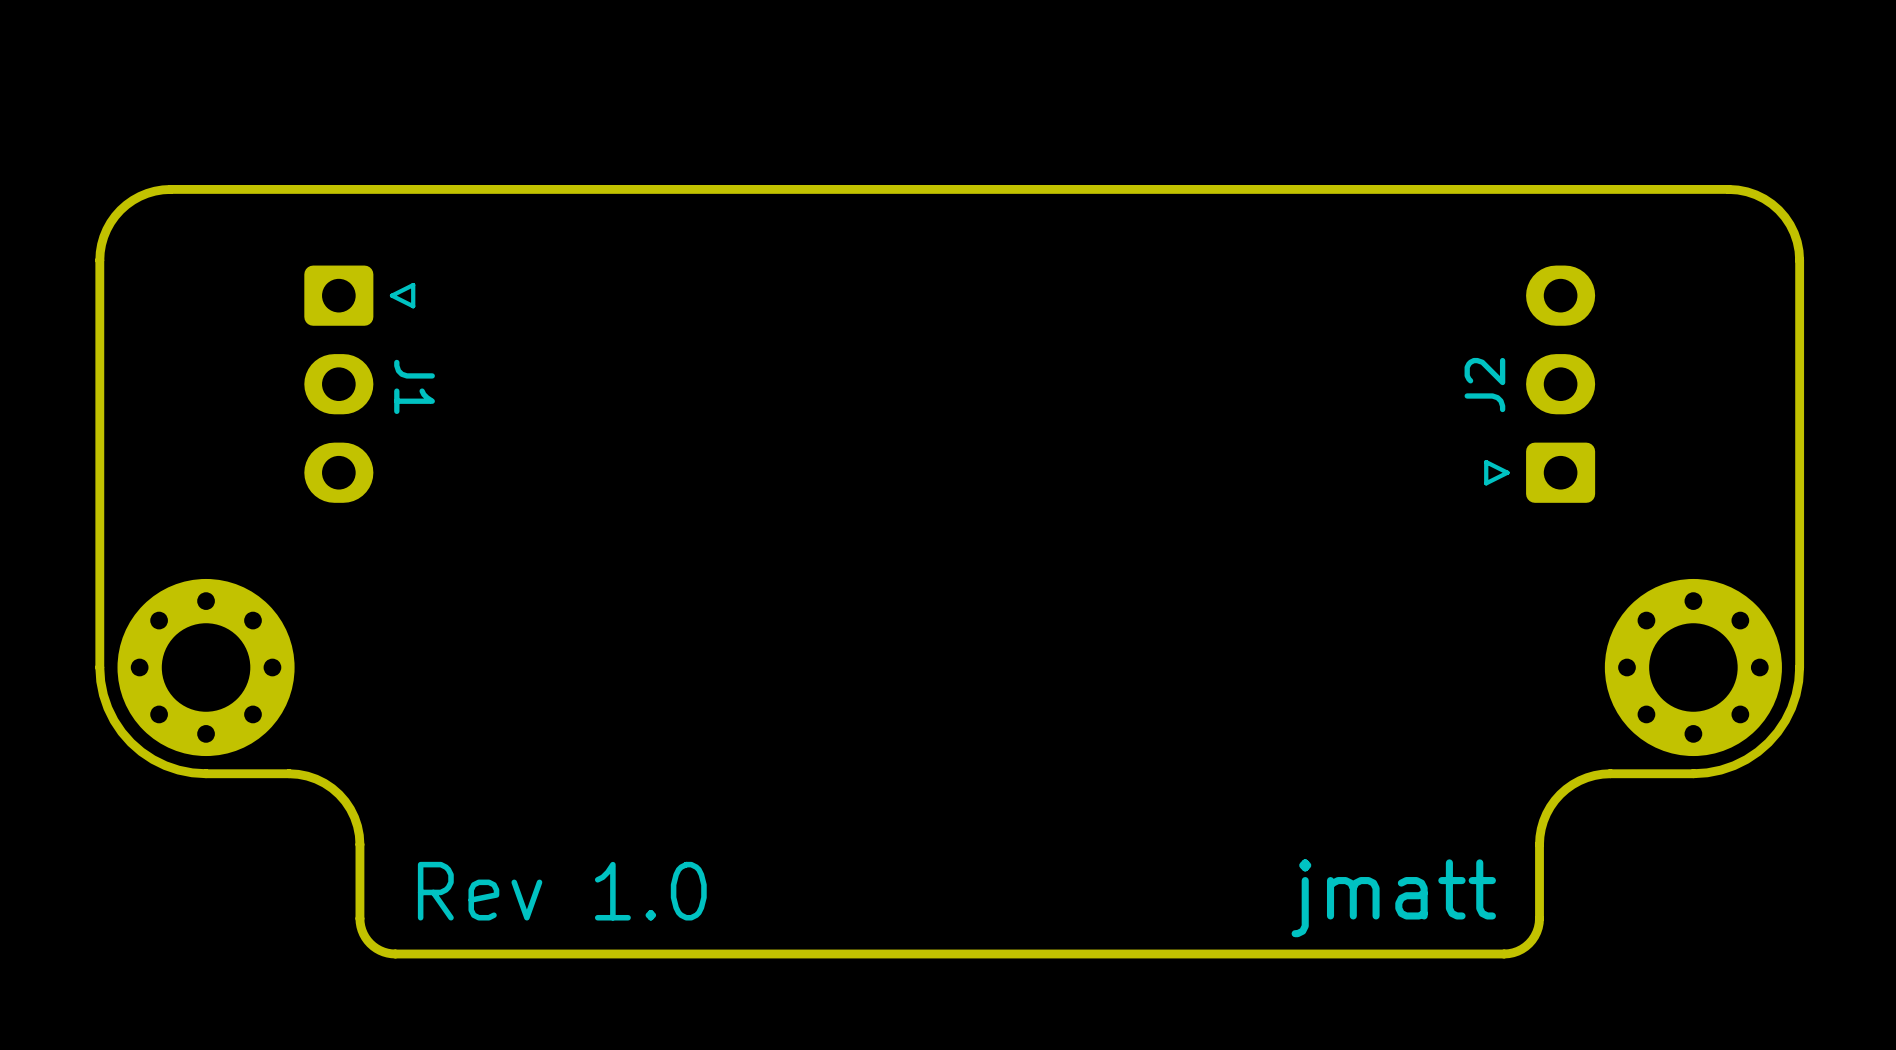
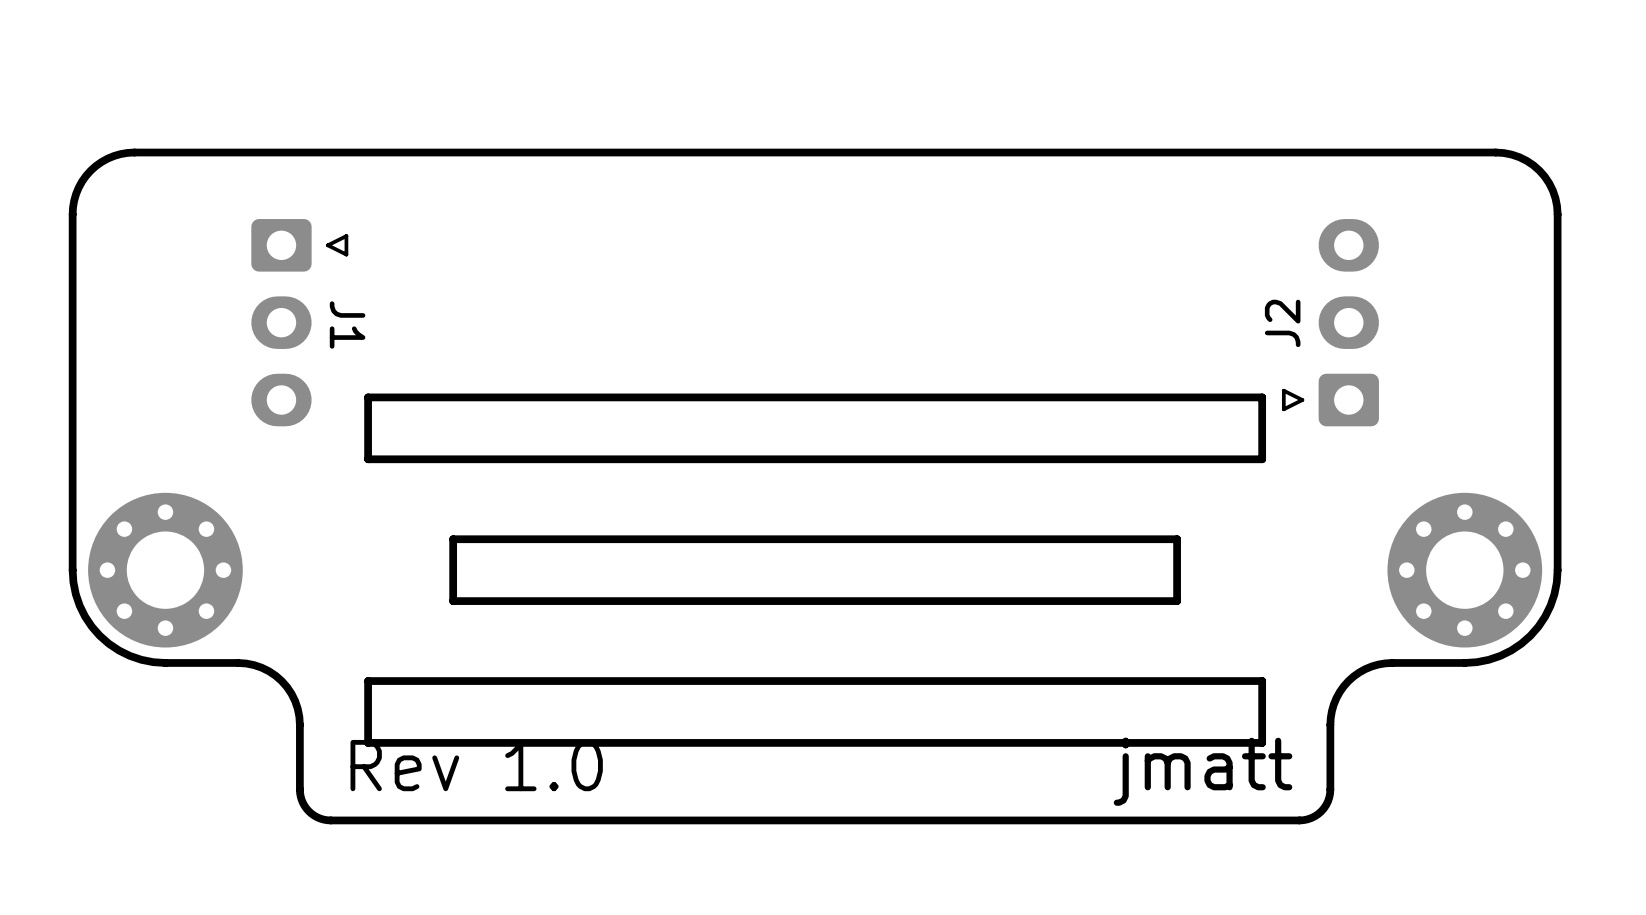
line: none -> (1262, 397) (1262, 459) (368, 459) (368, 397) (1262, 397)
line: none -> (1177, 539) (453, 539) (453, 601) (1177, 601) (1177, 539)
line: none -> (1262, 681) (1262, 742) (368, 742) (368, 681) (1262, 681)

